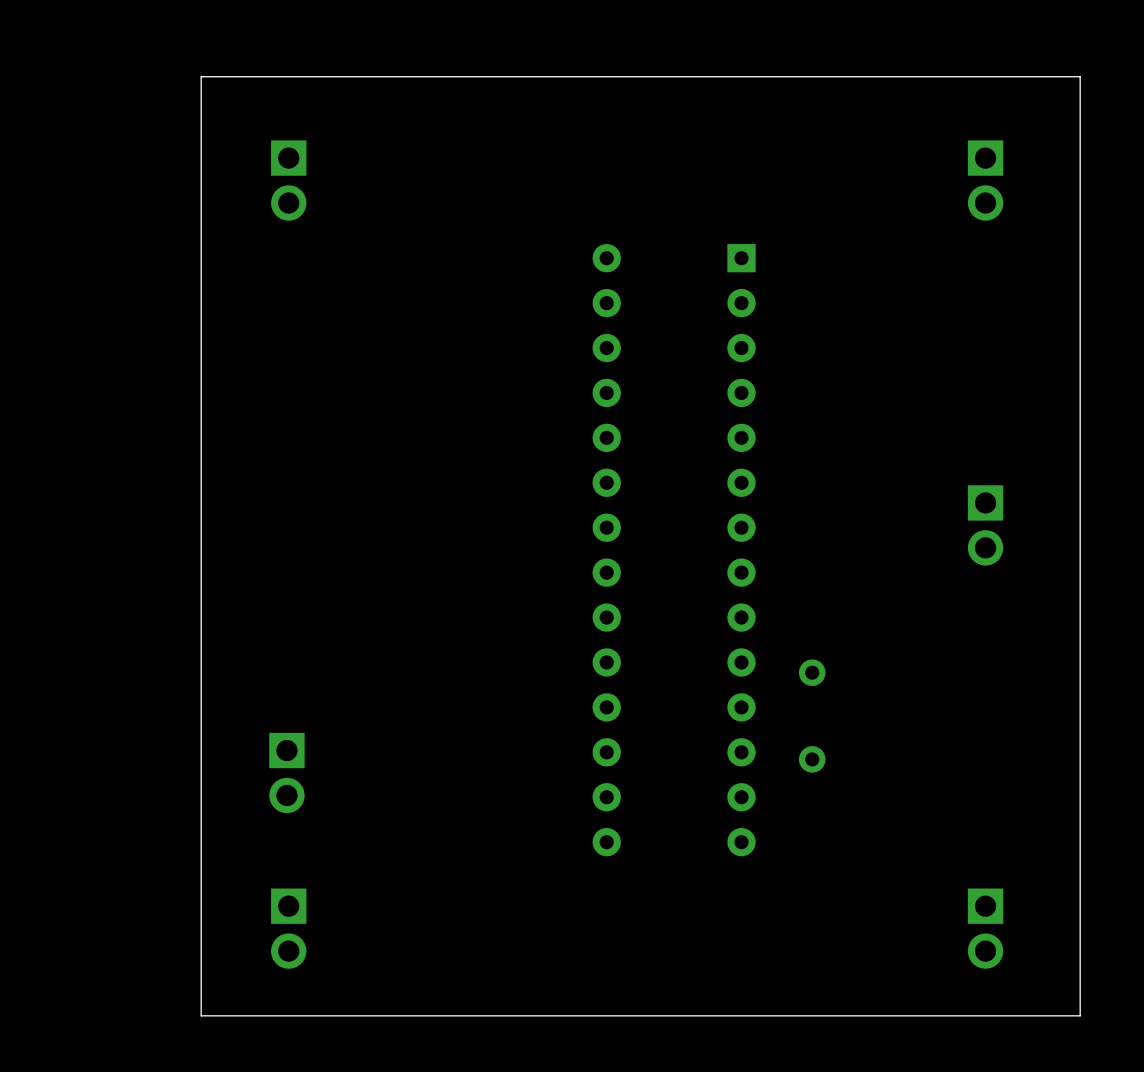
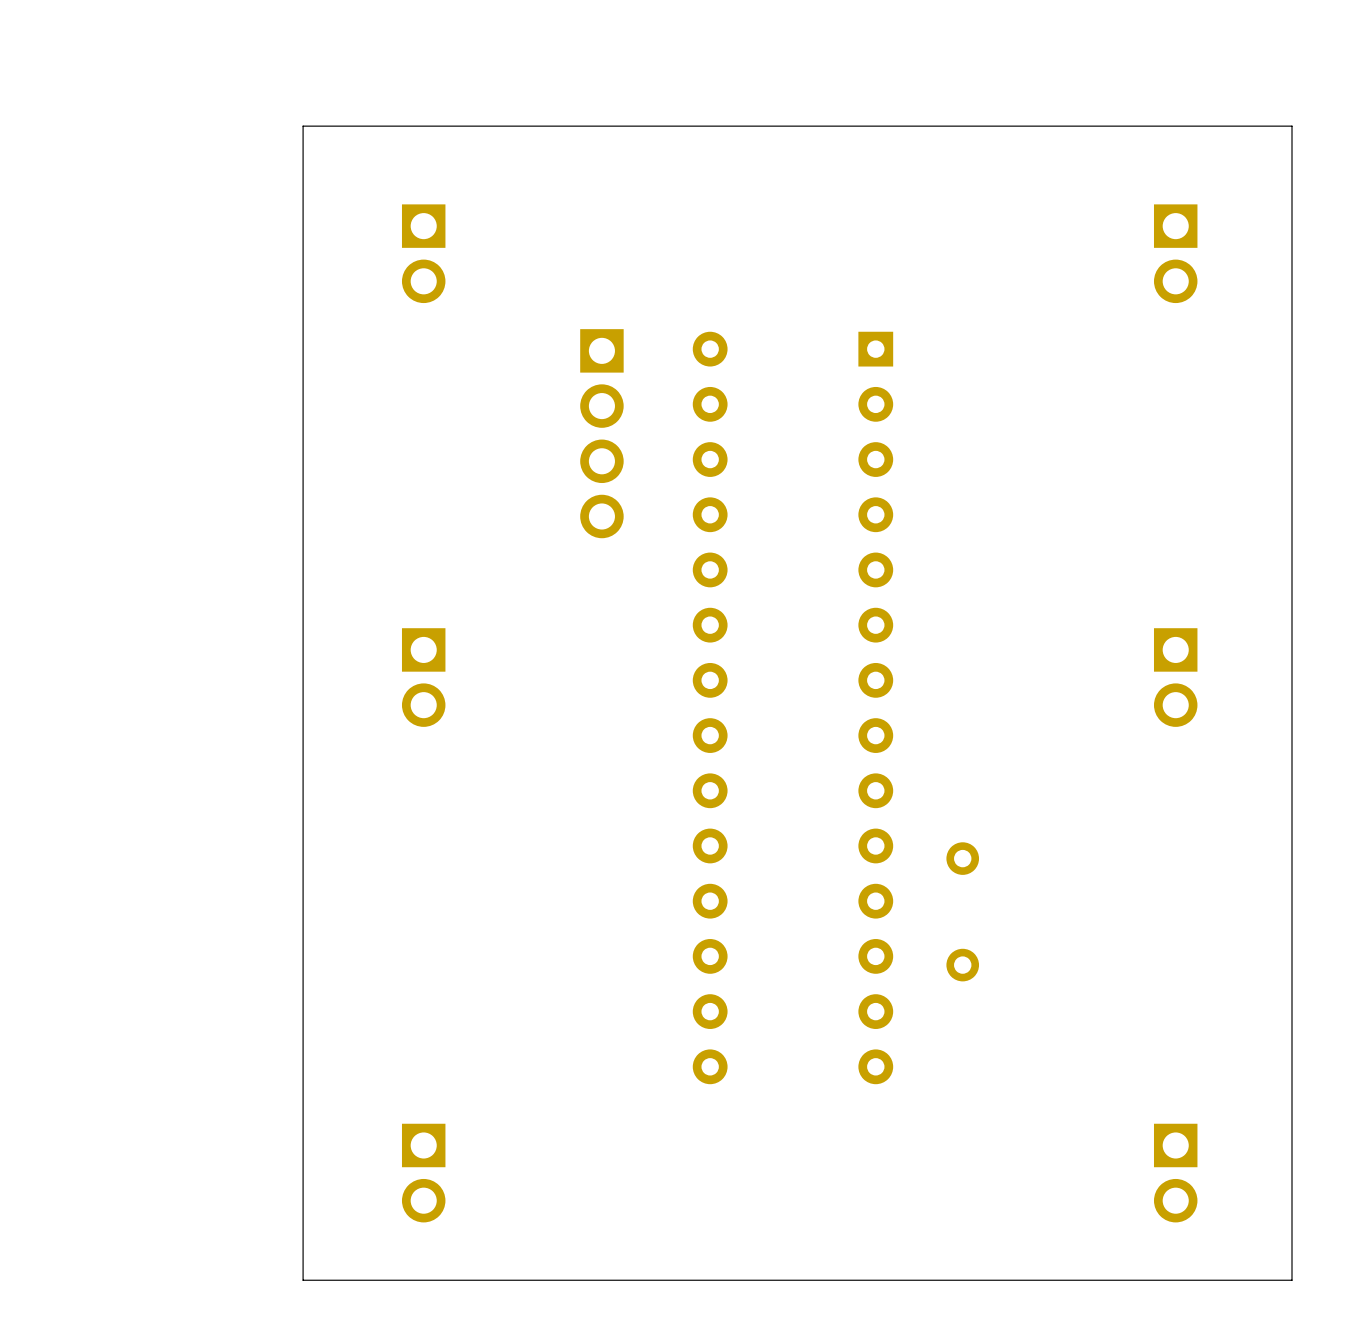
board edge: (275, 76) (201, 76) (201, 1015) (275, 1015) -> (303, 126) (303, 1280)
part position: (288, 180) -> (423, 253)
part: none -> (601, 433)
part: none -> (423, 677)
part: (286, 773) -> none
part position: (288, 928) -> (423, 1173)

